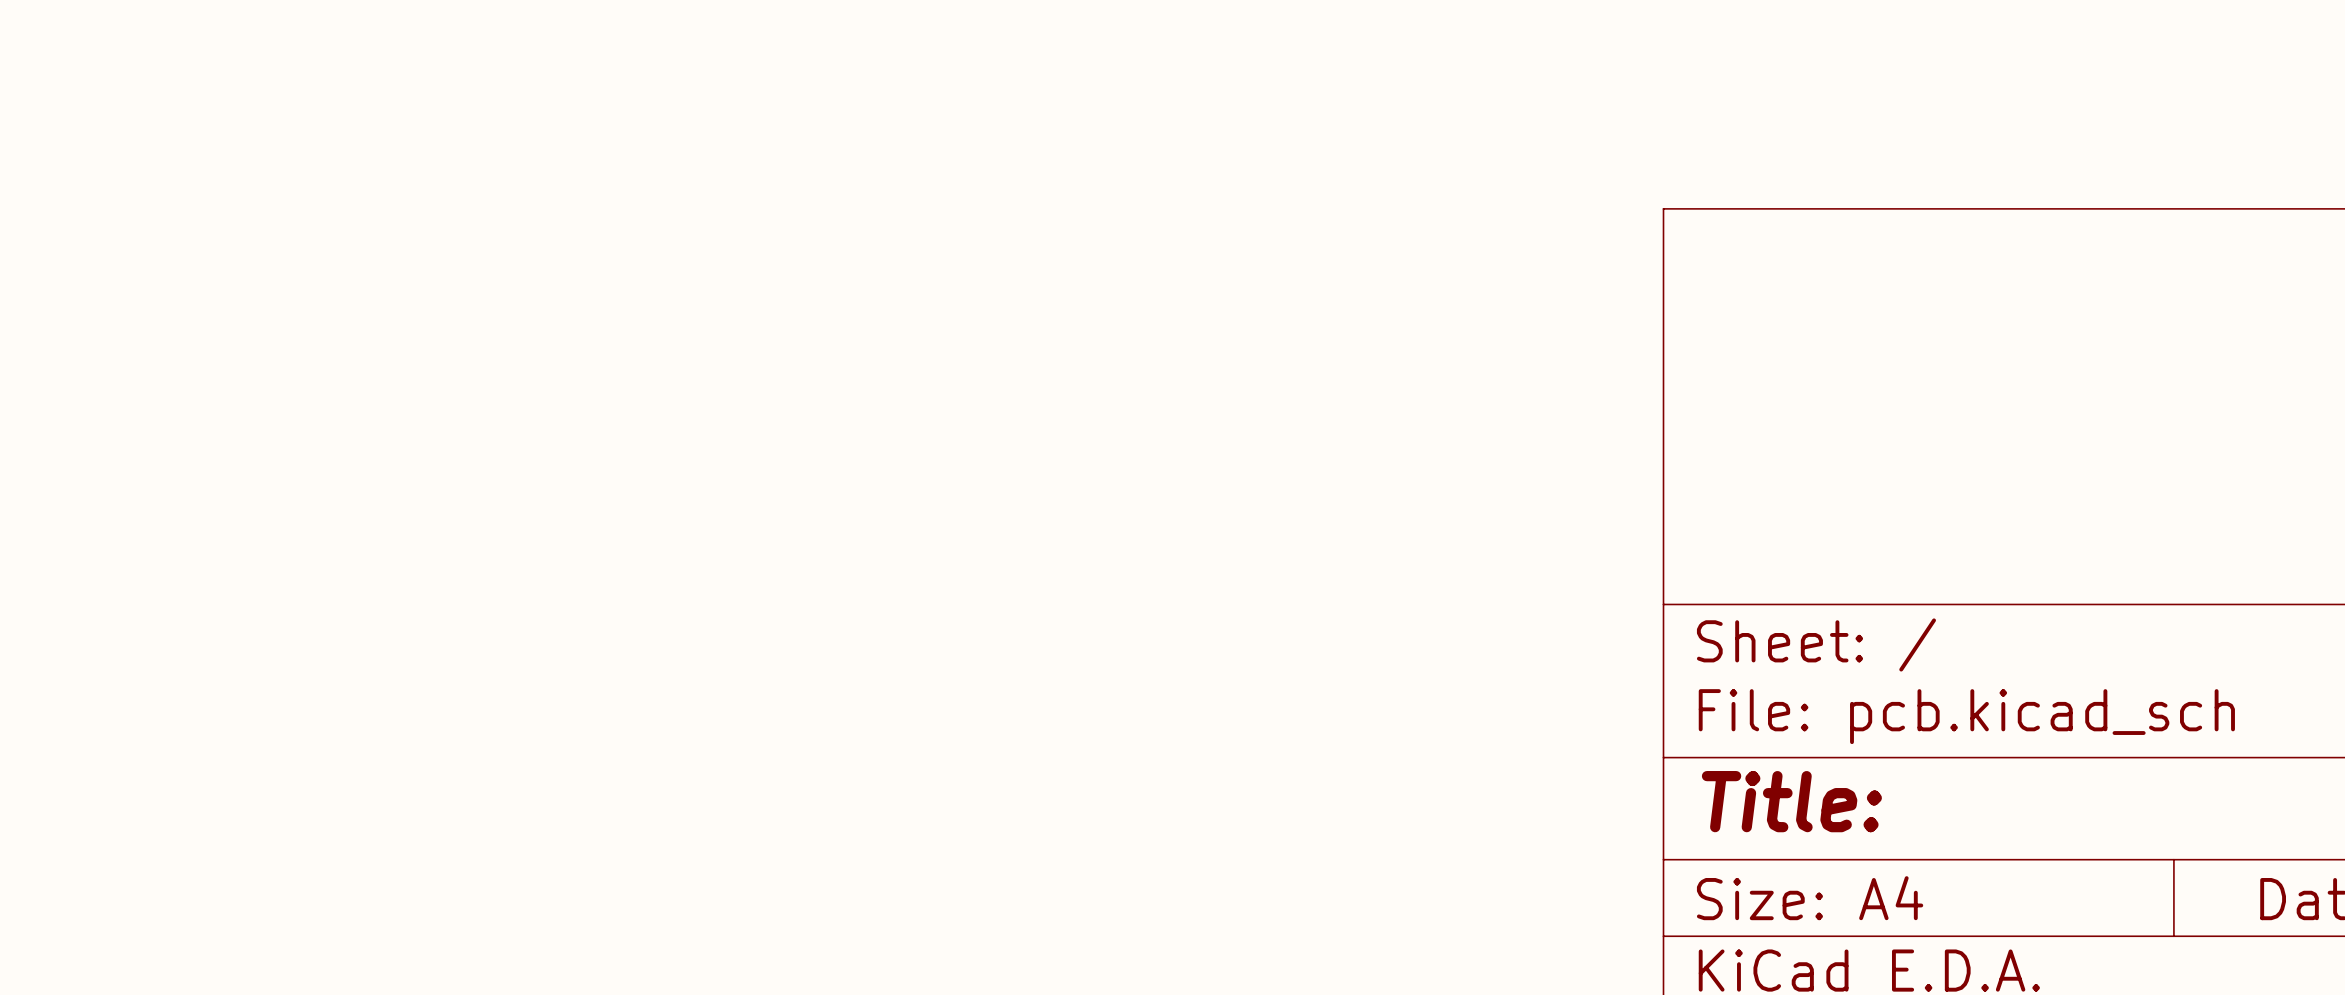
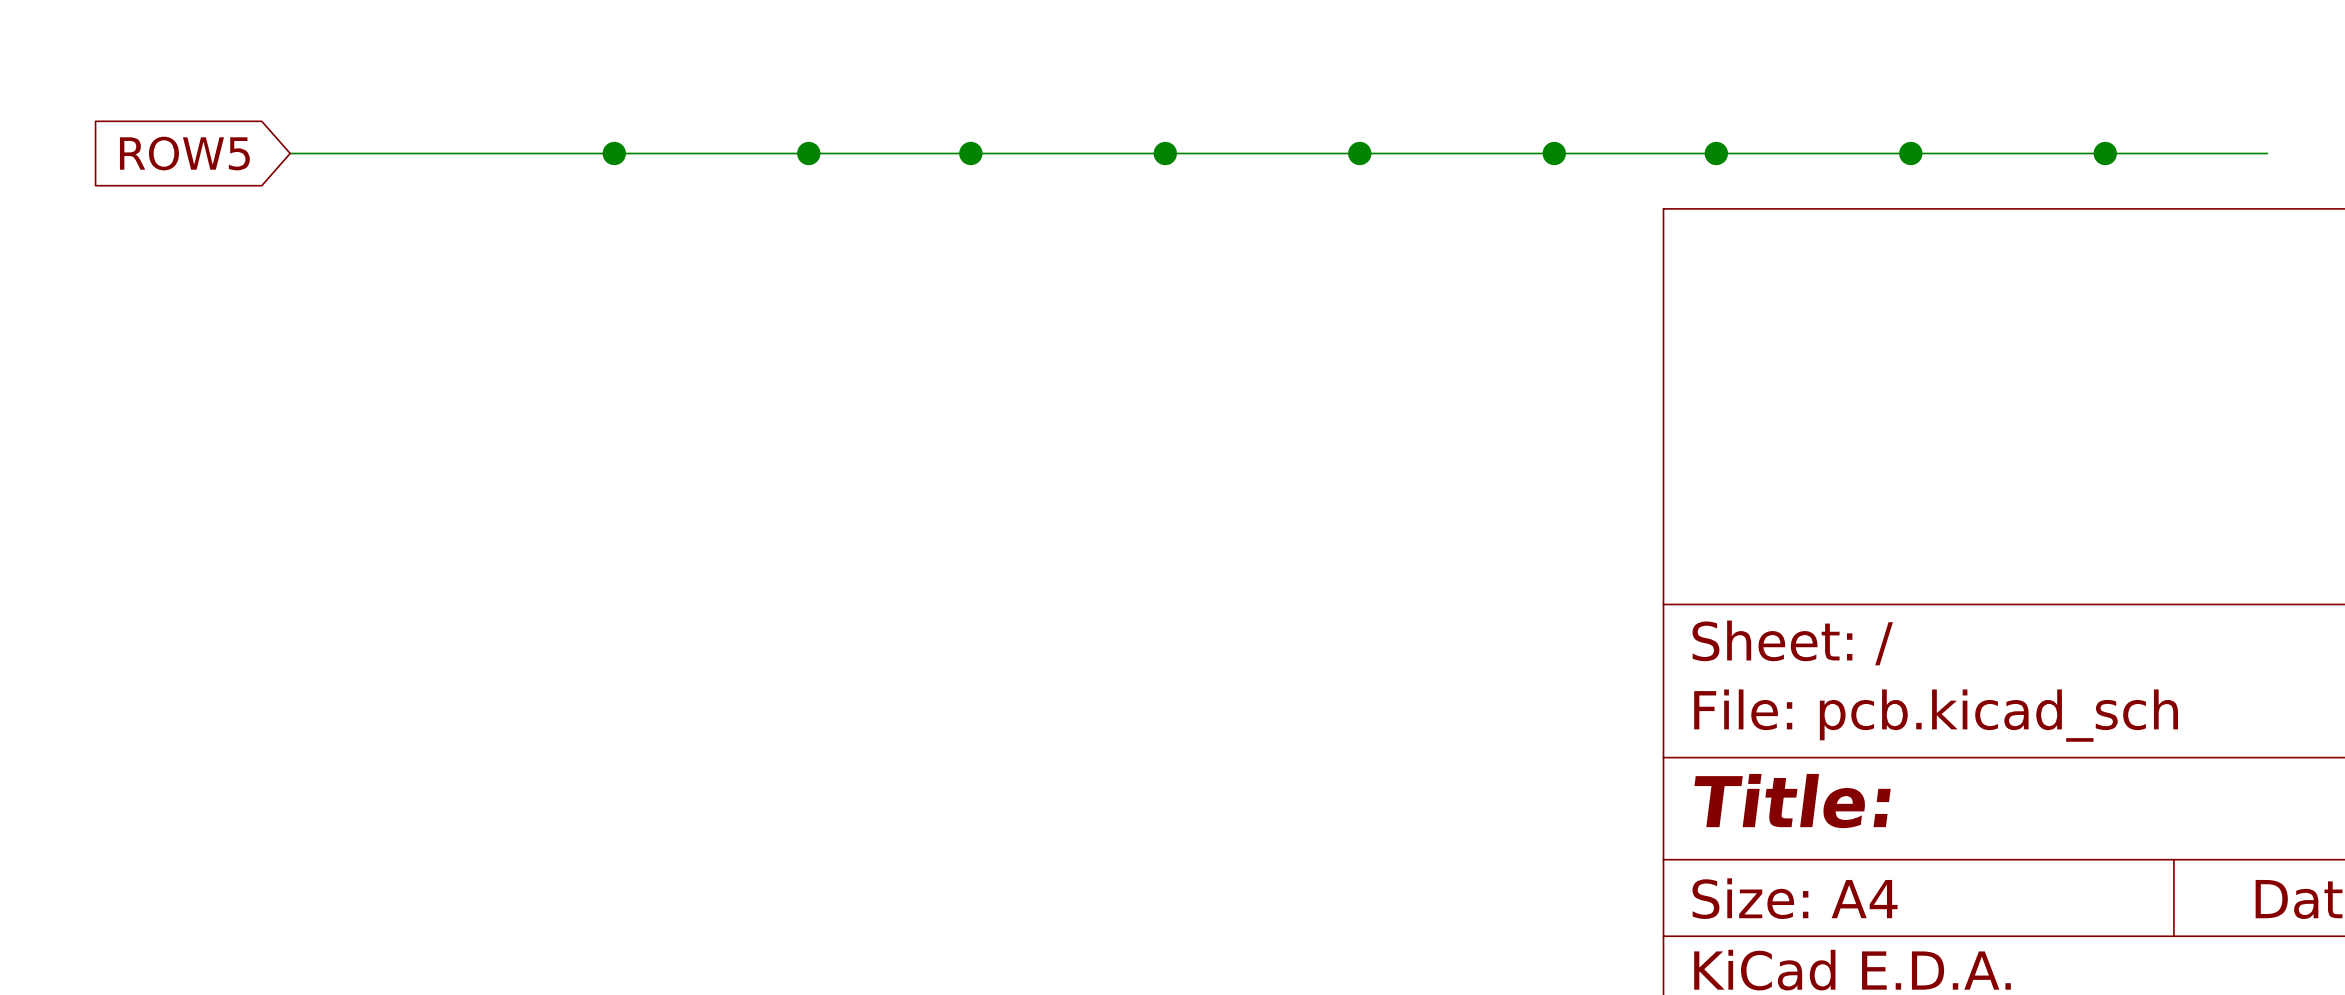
global label: none -> ROW5 (184, 153)
wire: none -> (290, 153) (2267, 153)
junction: none -> (614, 153)
junction: none -> (808, 153)
junction: none -> (970, 153)
junction: none -> (1165, 153)
junction: none -> (1359, 153)
junction: none -> (1554, 153)
junction: none -> (1716, 153)
junction: none -> (1910, 153)
junction: none -> (2105, 153)

